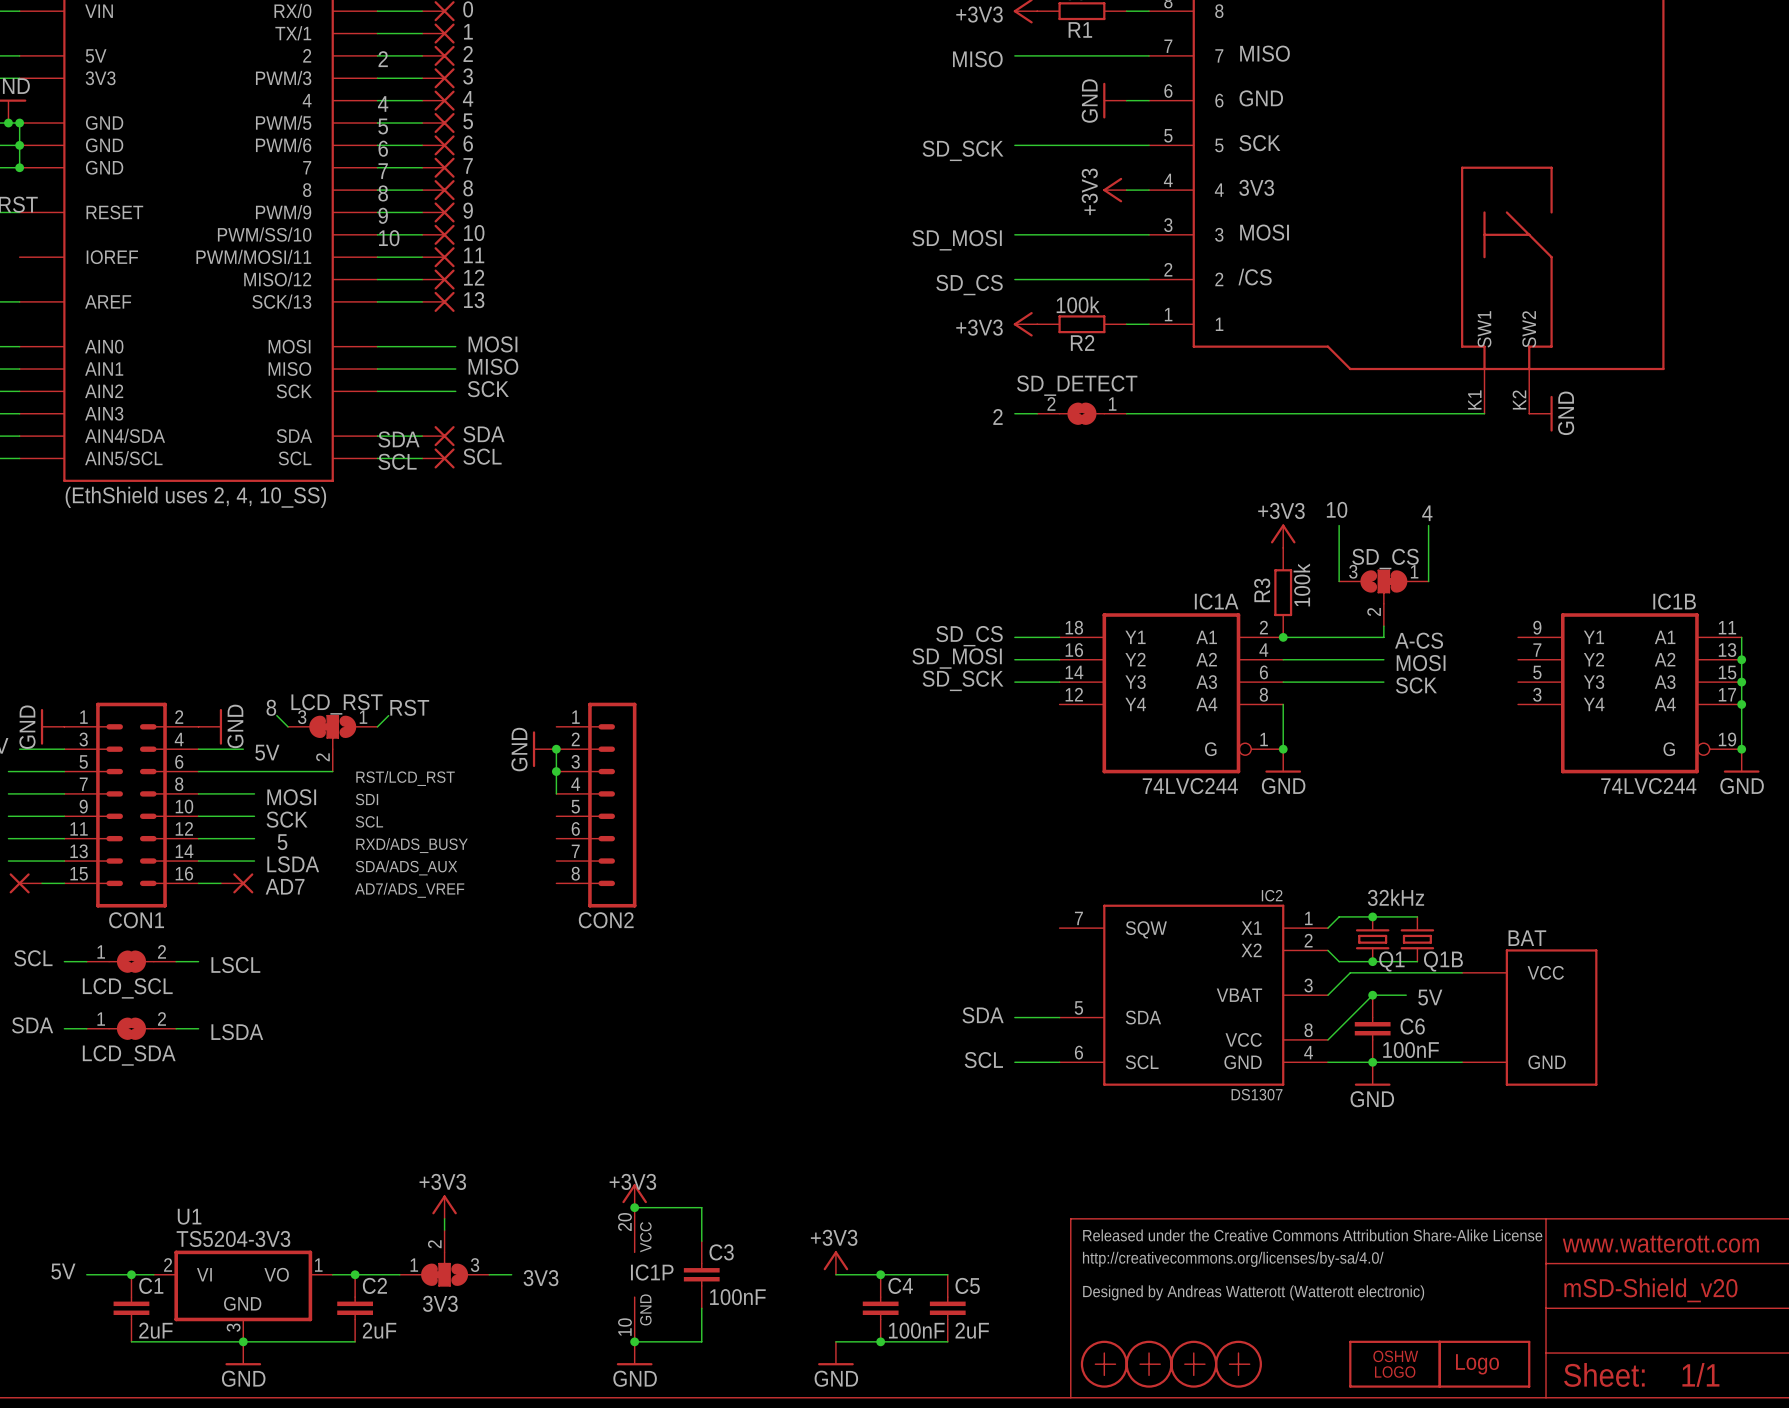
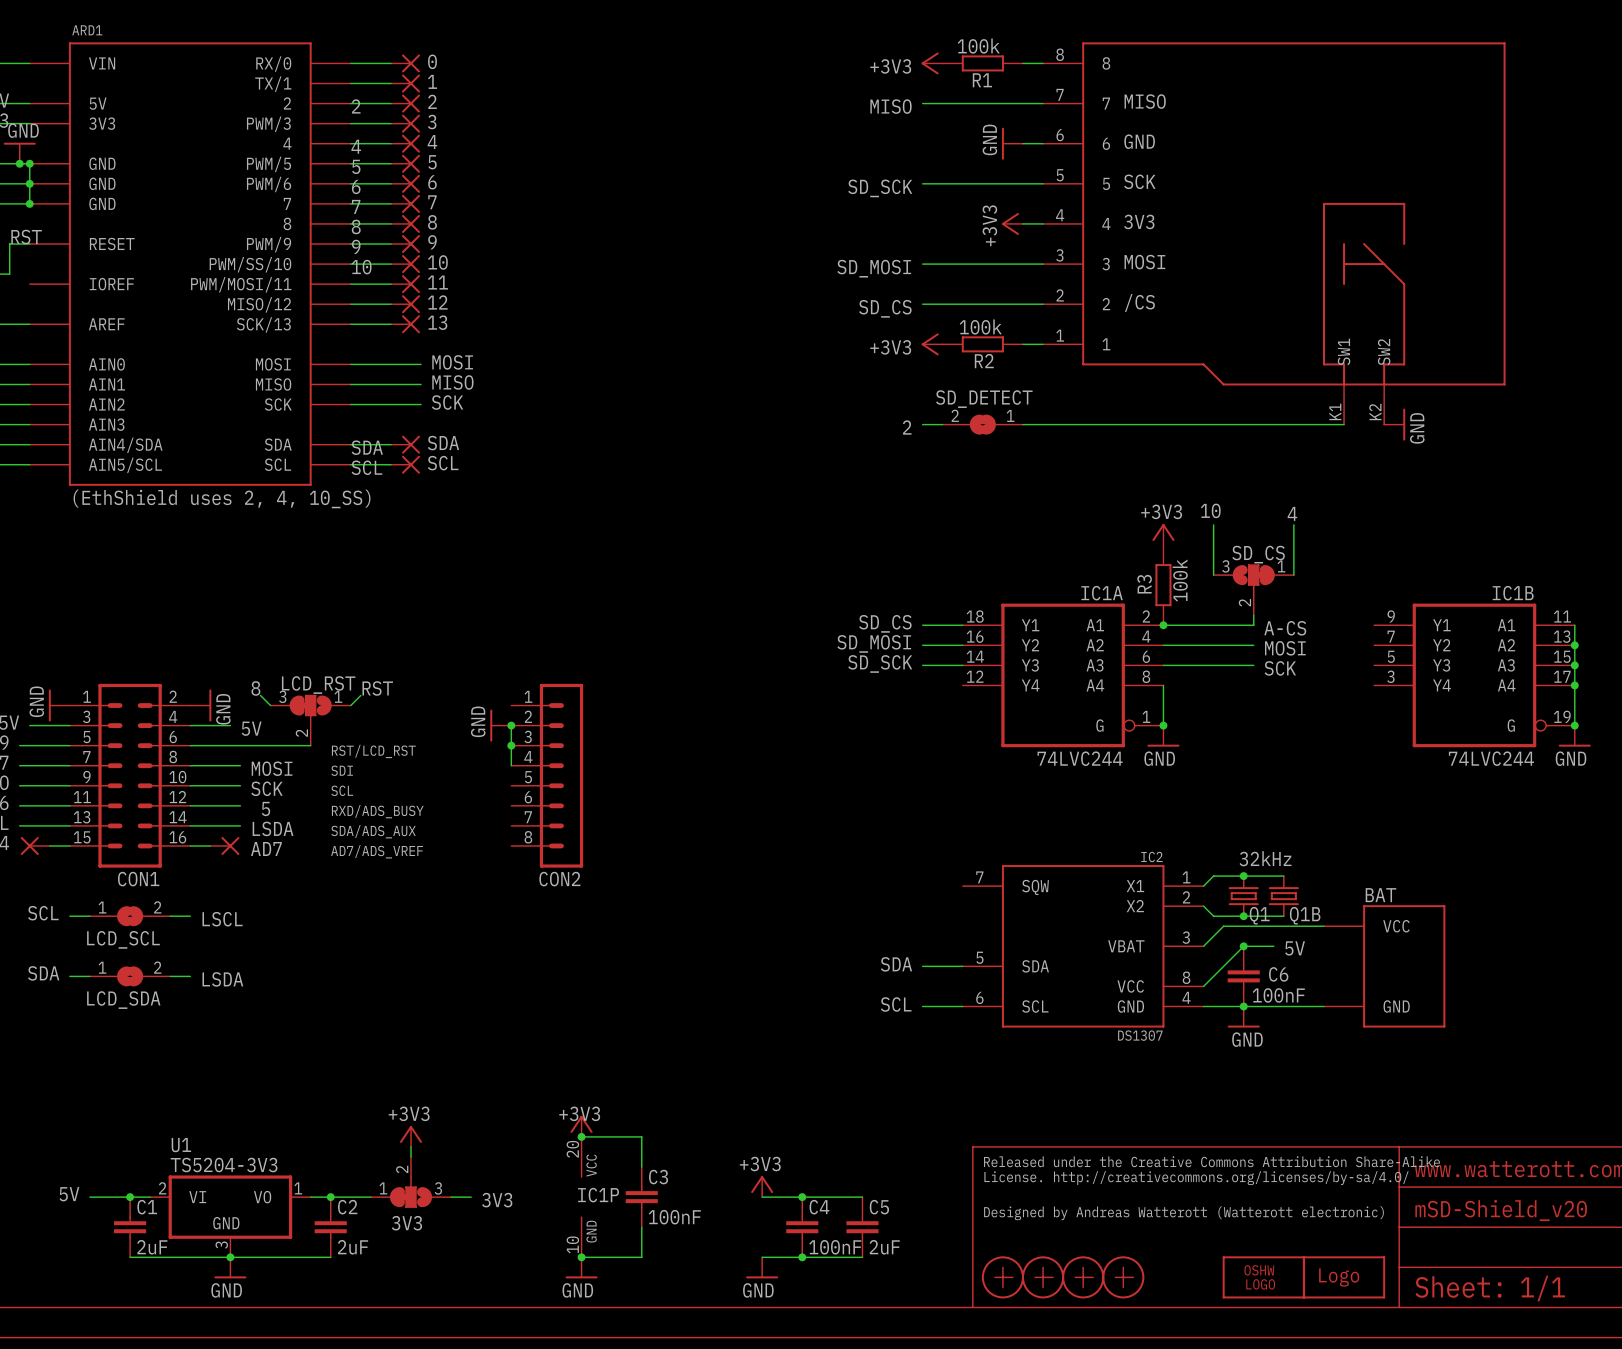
text: Released under the Creative Commons Attribution Share-Alike License (1312, 1235) -> License. http://creativecommons.org/licenses/by-sa/4.0/ (1196, 1178)
text: http://creativecommons.org/licenses/by-sa/4.0/ (1233, 1259) -> none

